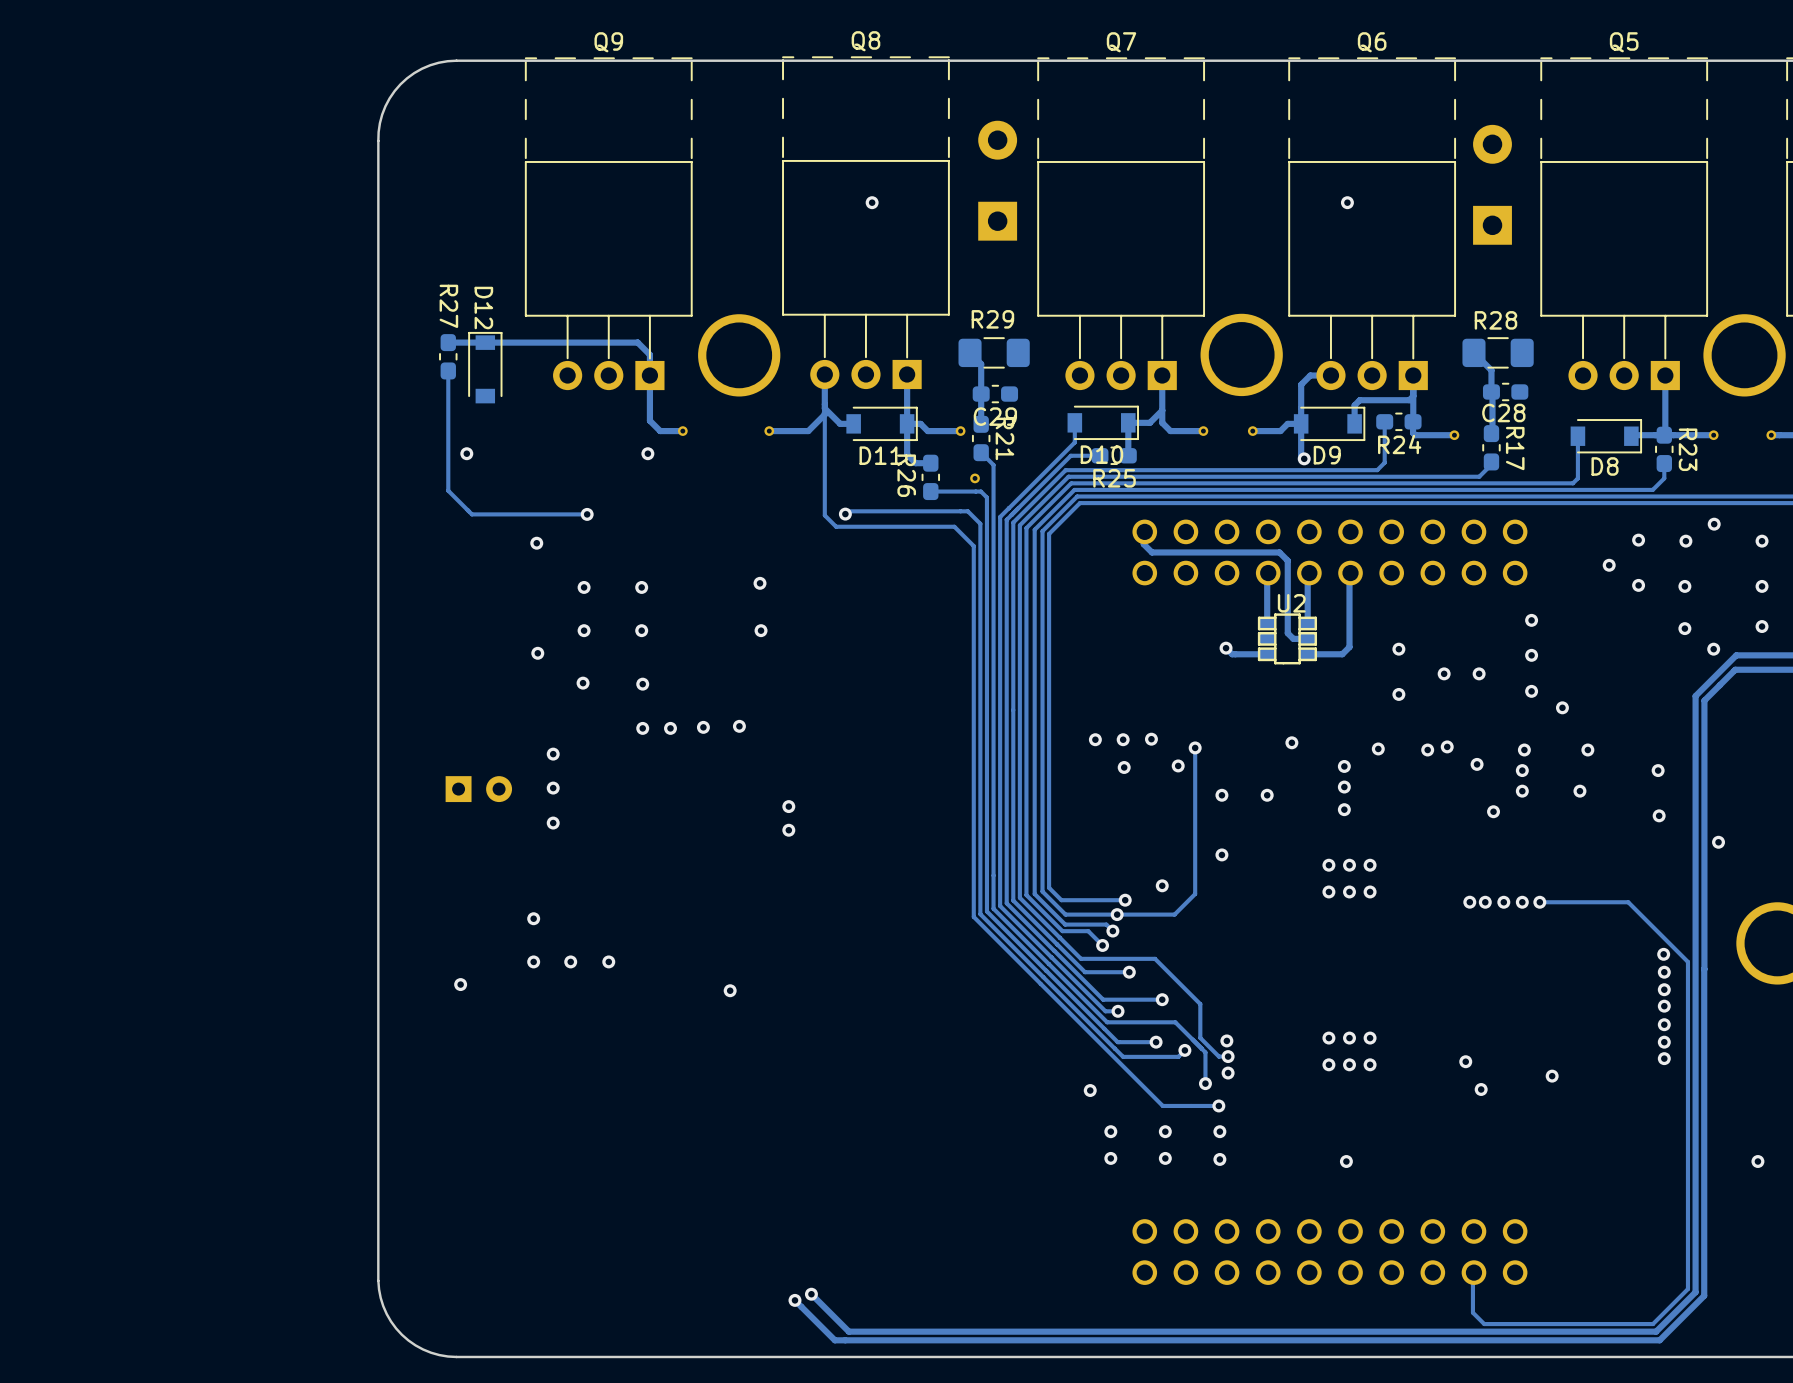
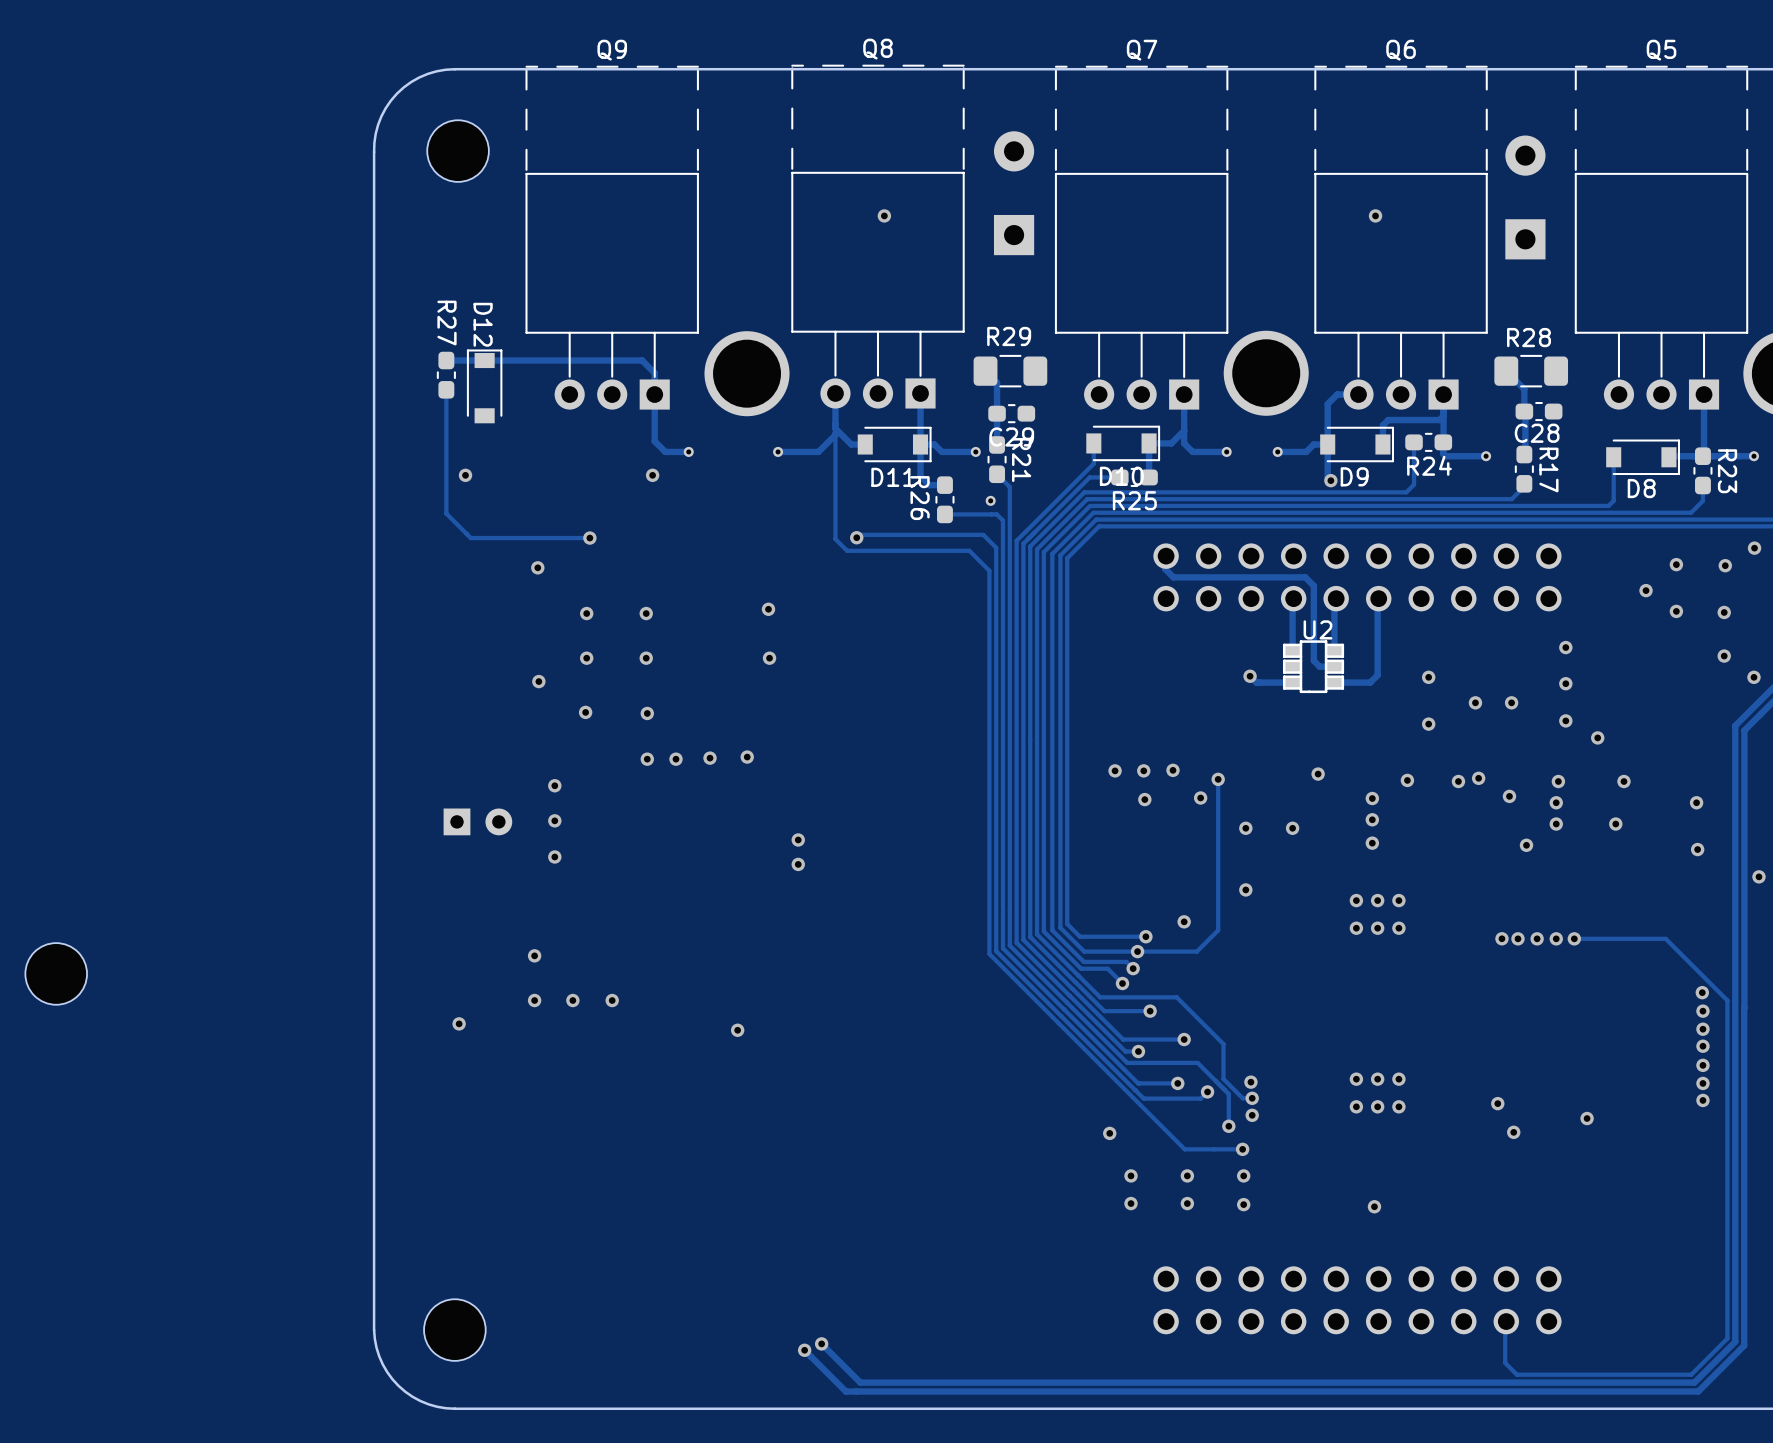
part: none -> (458, 151)
part: none -> (56, 973)
part: none -> (454, 1330)

